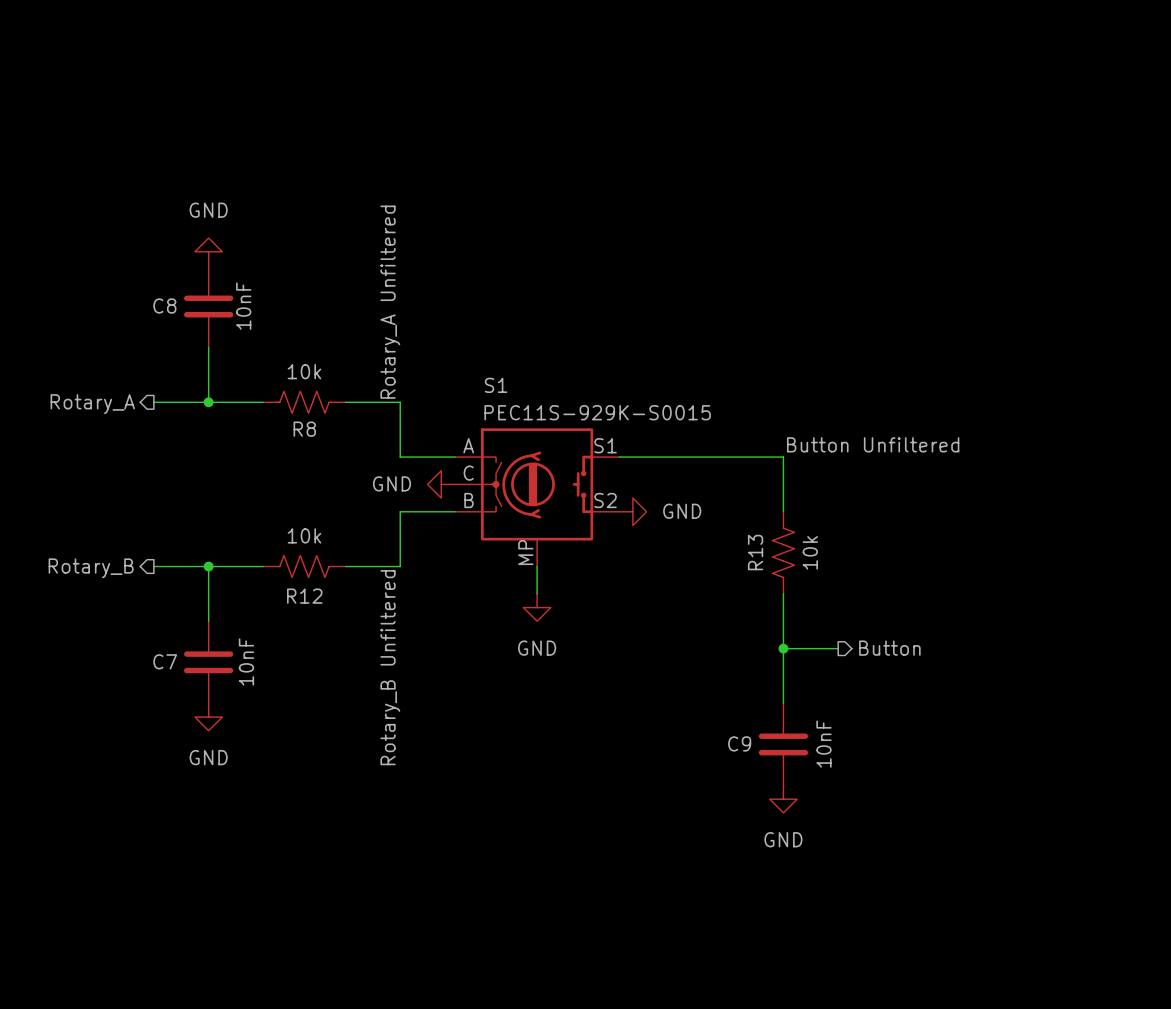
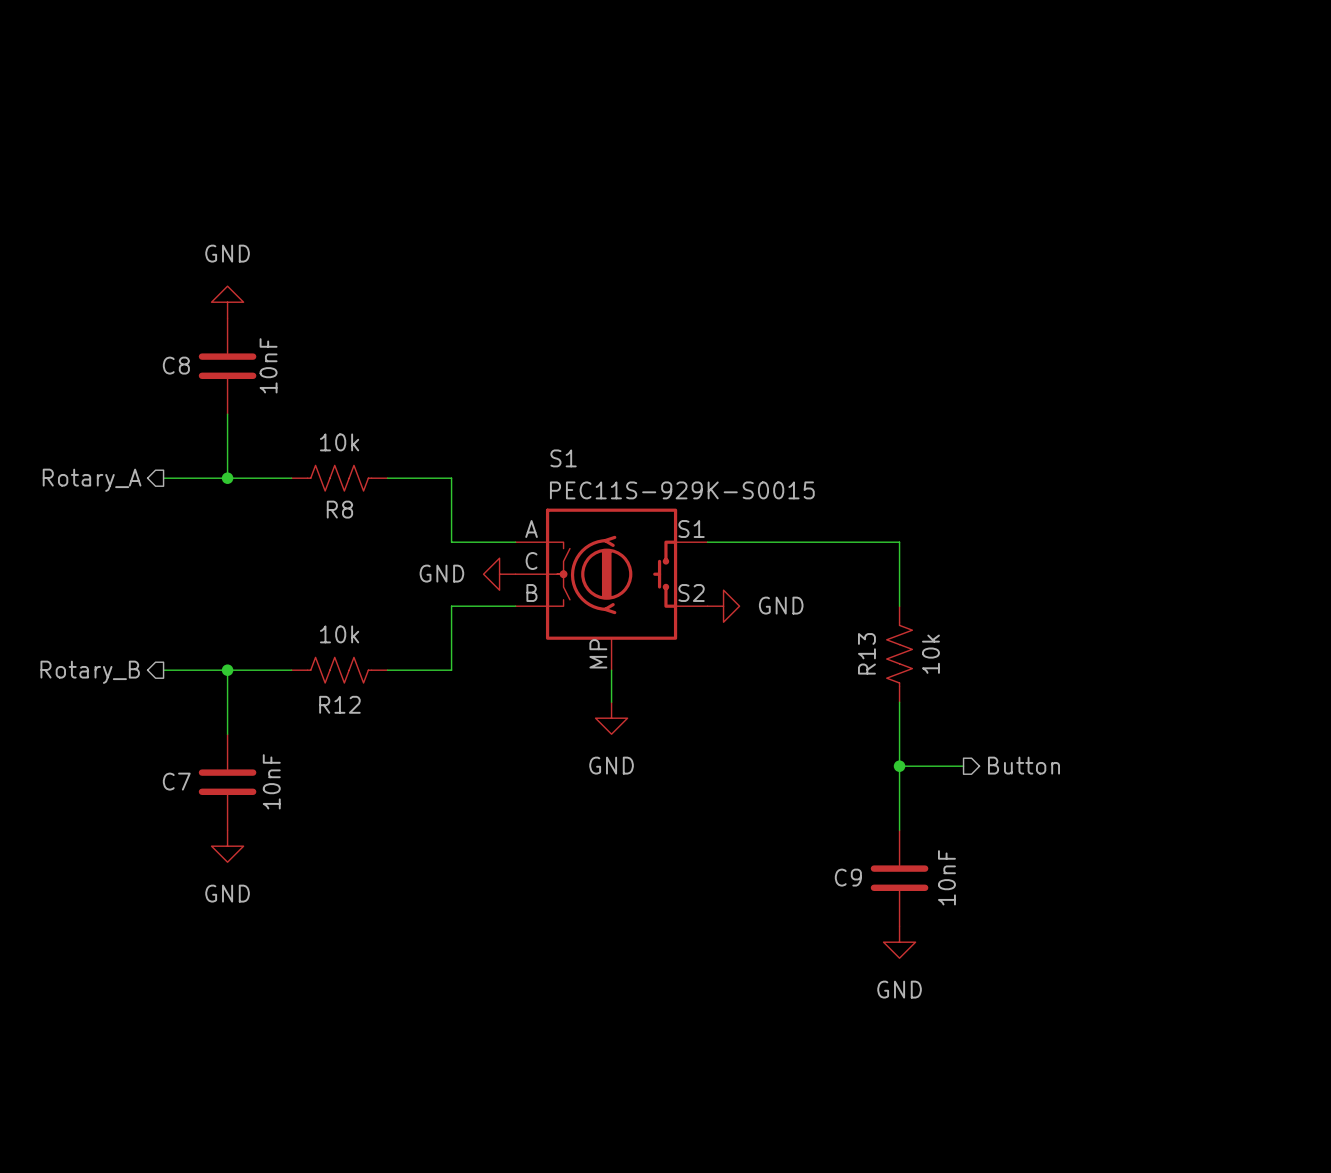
label: Rotary_A Unfiltered (390, 302) -> none
label: Button Unfiltered (873, 444) -> none
label: Rotary_B Unfiltered (390, 667) -> none

